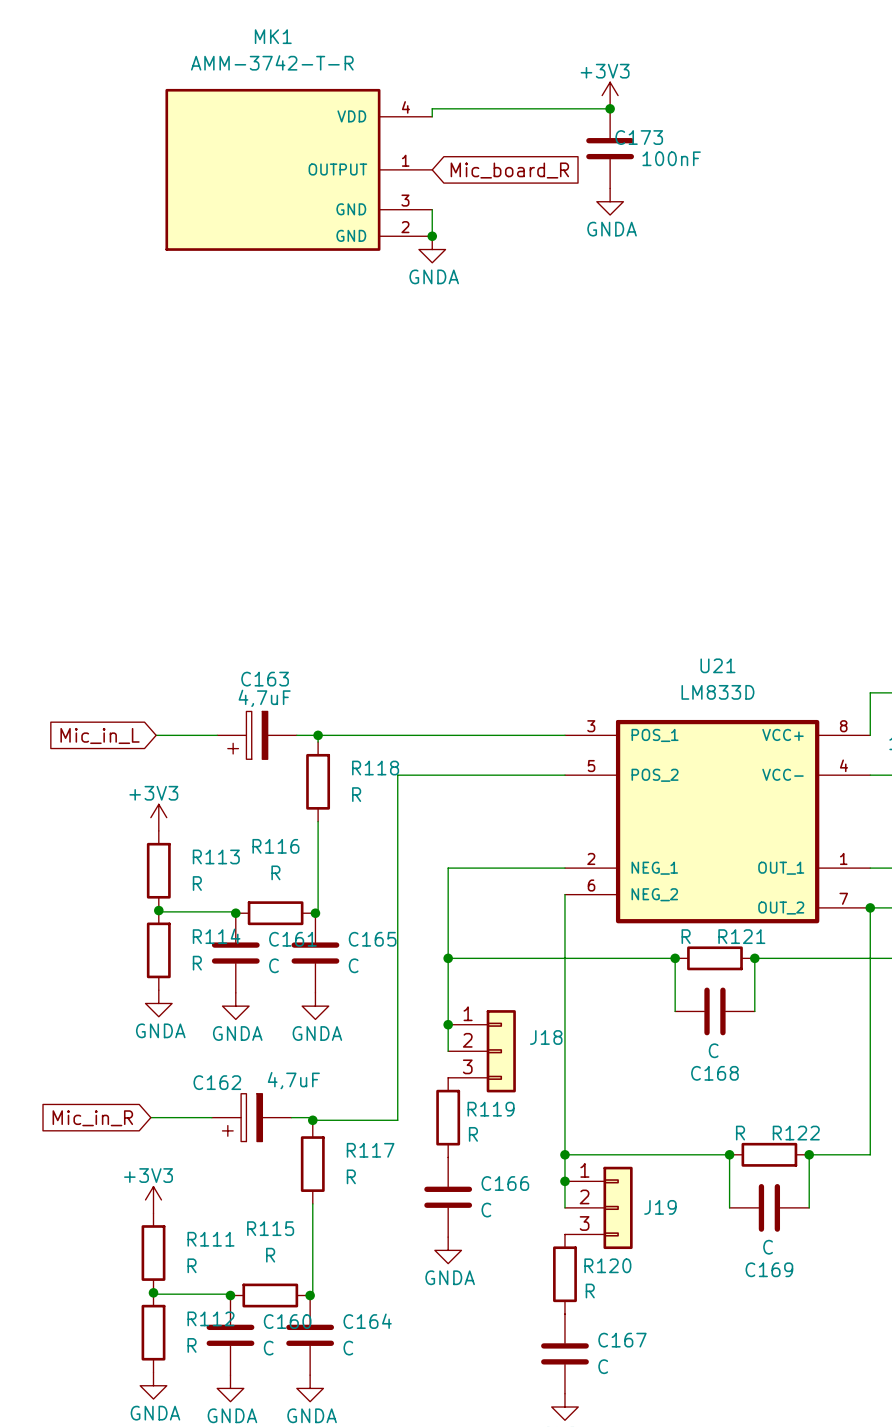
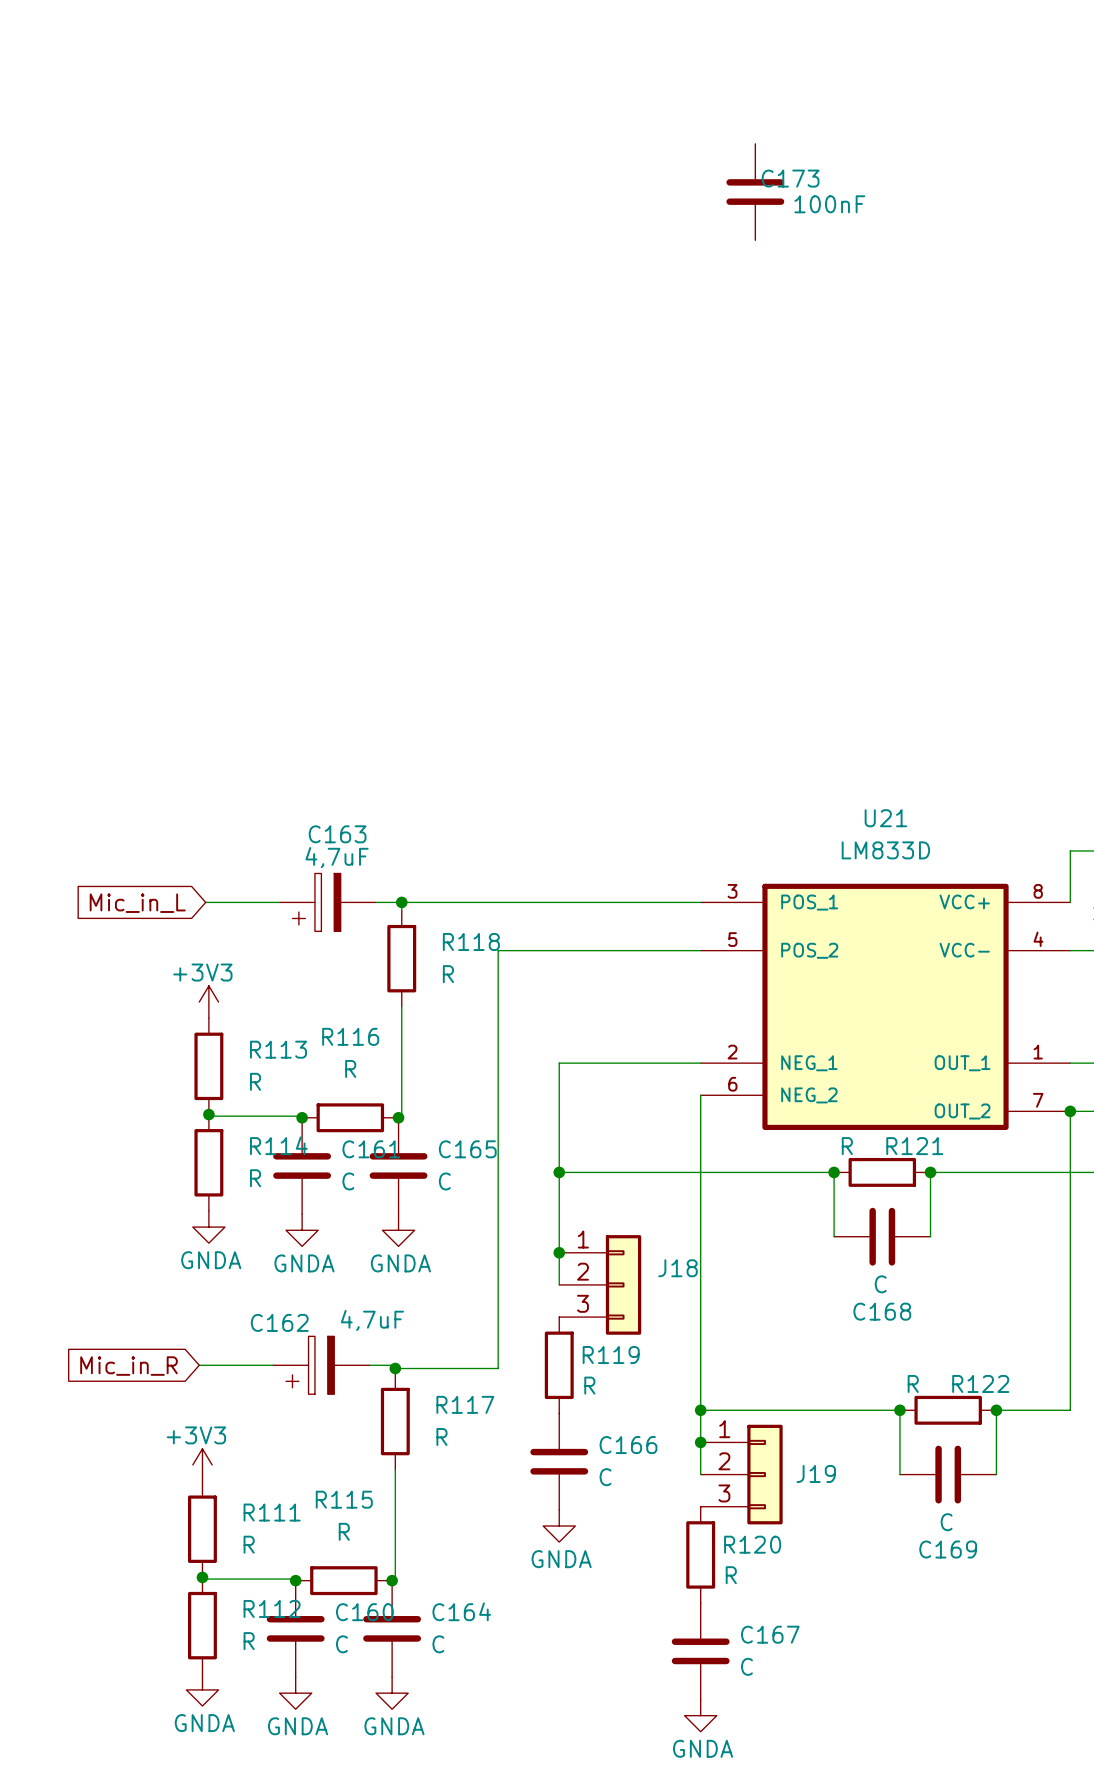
power symbol: +3V3 (610, 95) -> none
wire: (610, 108) (432, 108) (432, 116) -> none
junction: (610, 108) -> none
MK1: AMM-3742-T-R (298, 169) -> none
global label: Mic_board_R (509, 170) -> none
power symbol: GNDA (610, 201) -> none
wire: (432, 209) (432, 236) -> none
junction: (432, 236) -> none
power symbol: GNDA (432, 249) -> none

